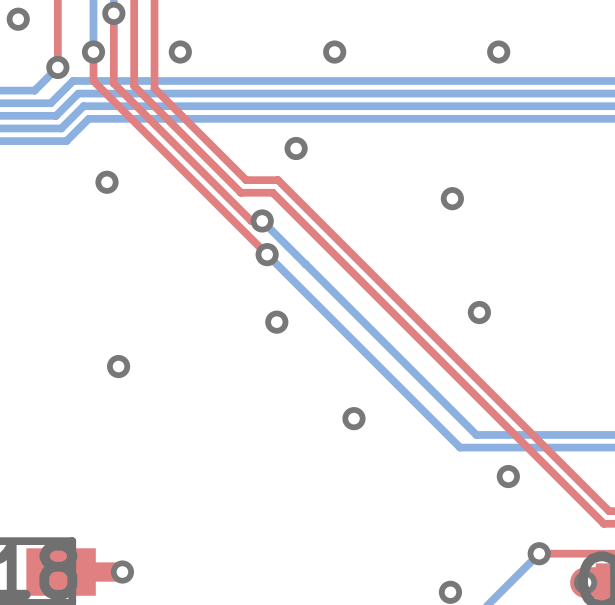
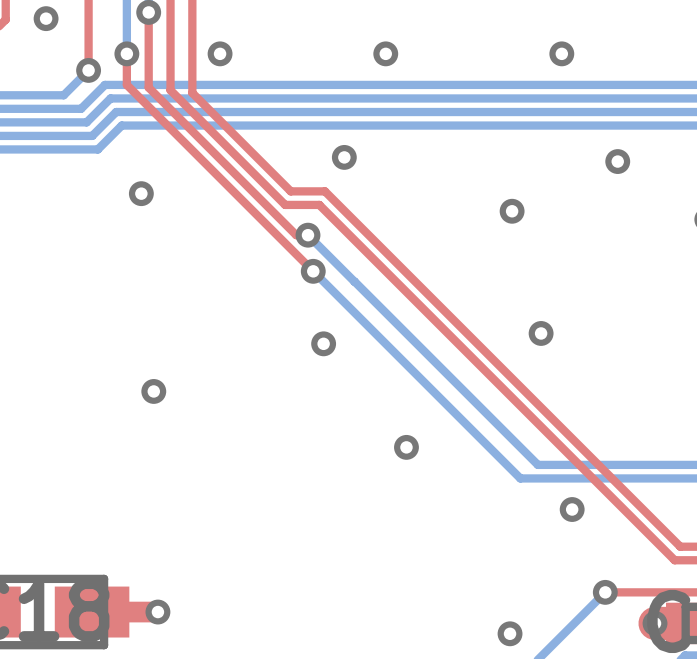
via: none -> (617, 161)

